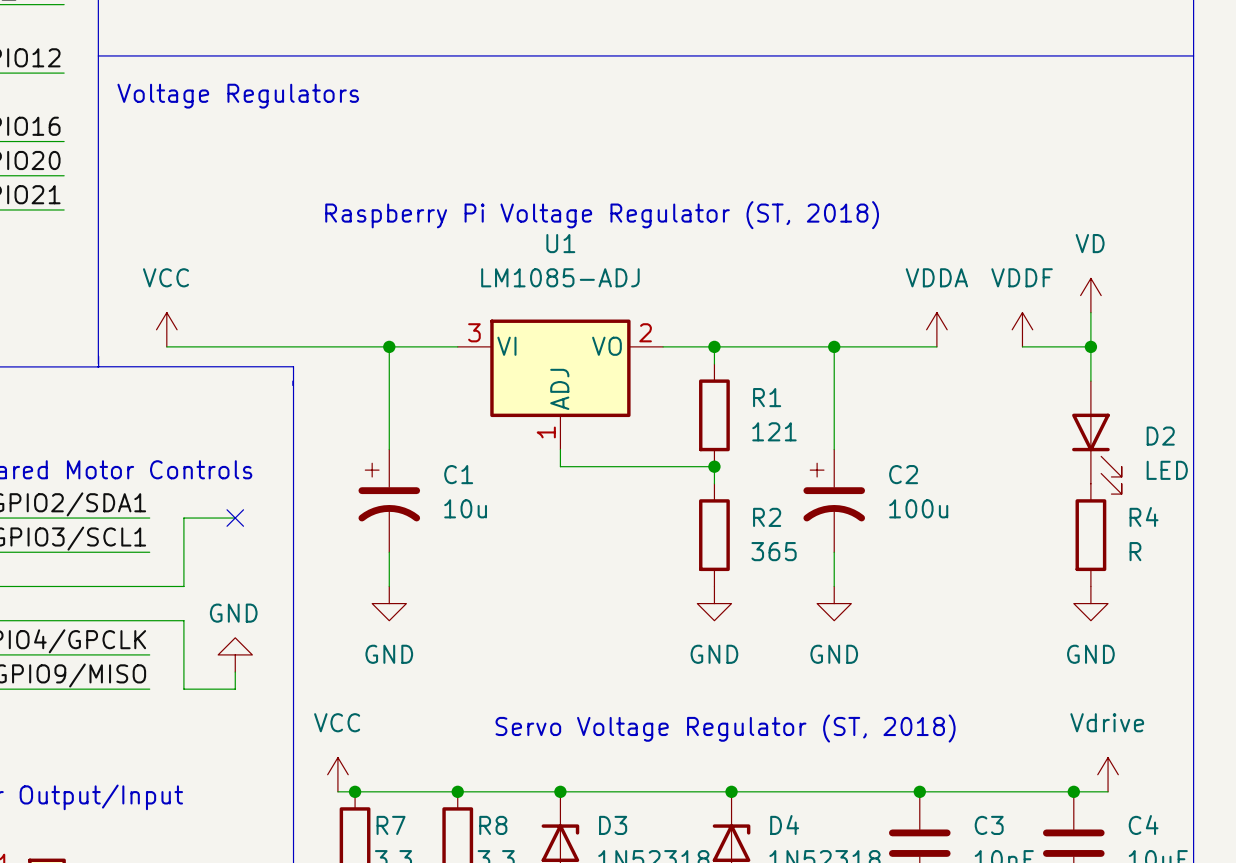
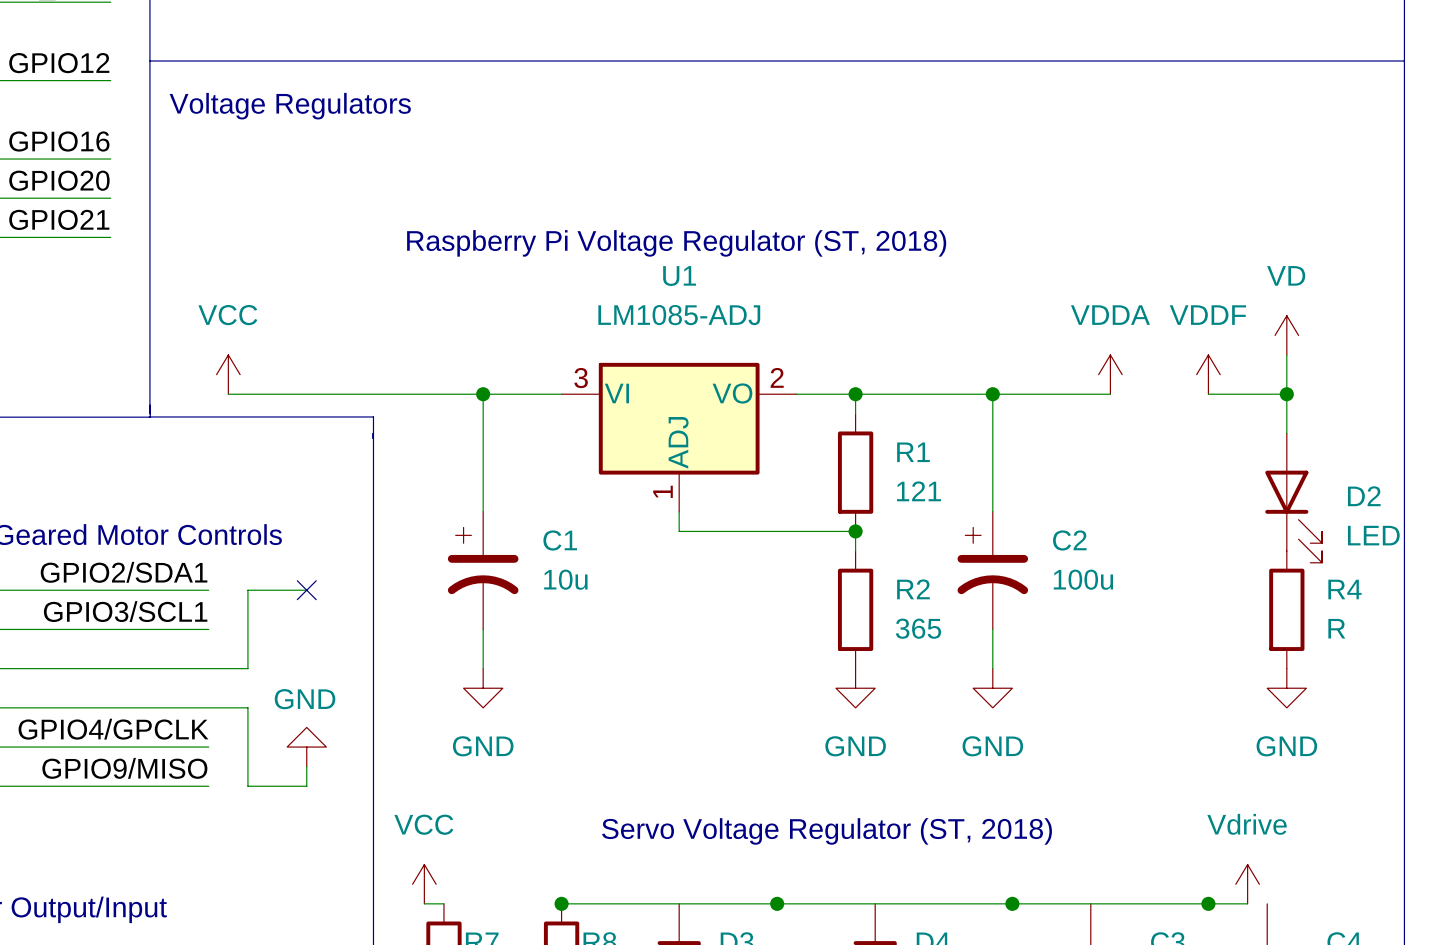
power symbol position: Vdrive (1108, 774) -> Vdrive (1247, 884)
wire: (355, 791) (457, 791) -> none
junction: (355, 791) -> none
junction: (560, 791) -> none
junction: none -> (777, 903)
junction: (731, 791) -> none
junction: none -> (1012, 903)
junction: (919, 791) -> none
junction: none -> (1208, 903)
wire: (1056, 791) (1108, 791) -> none
junction: (1073, 791) -> none

